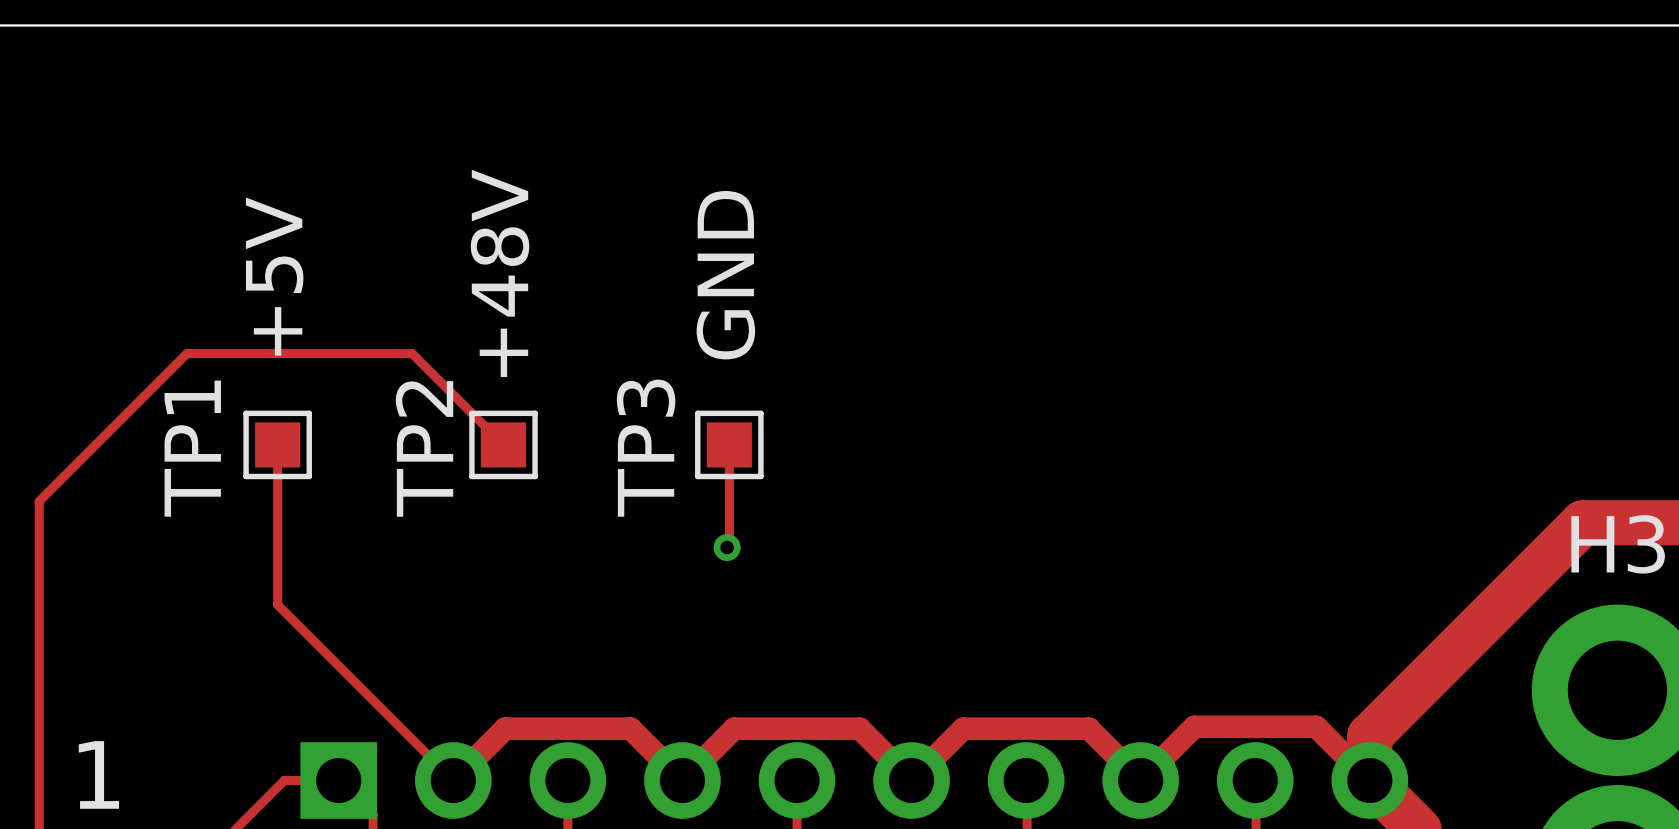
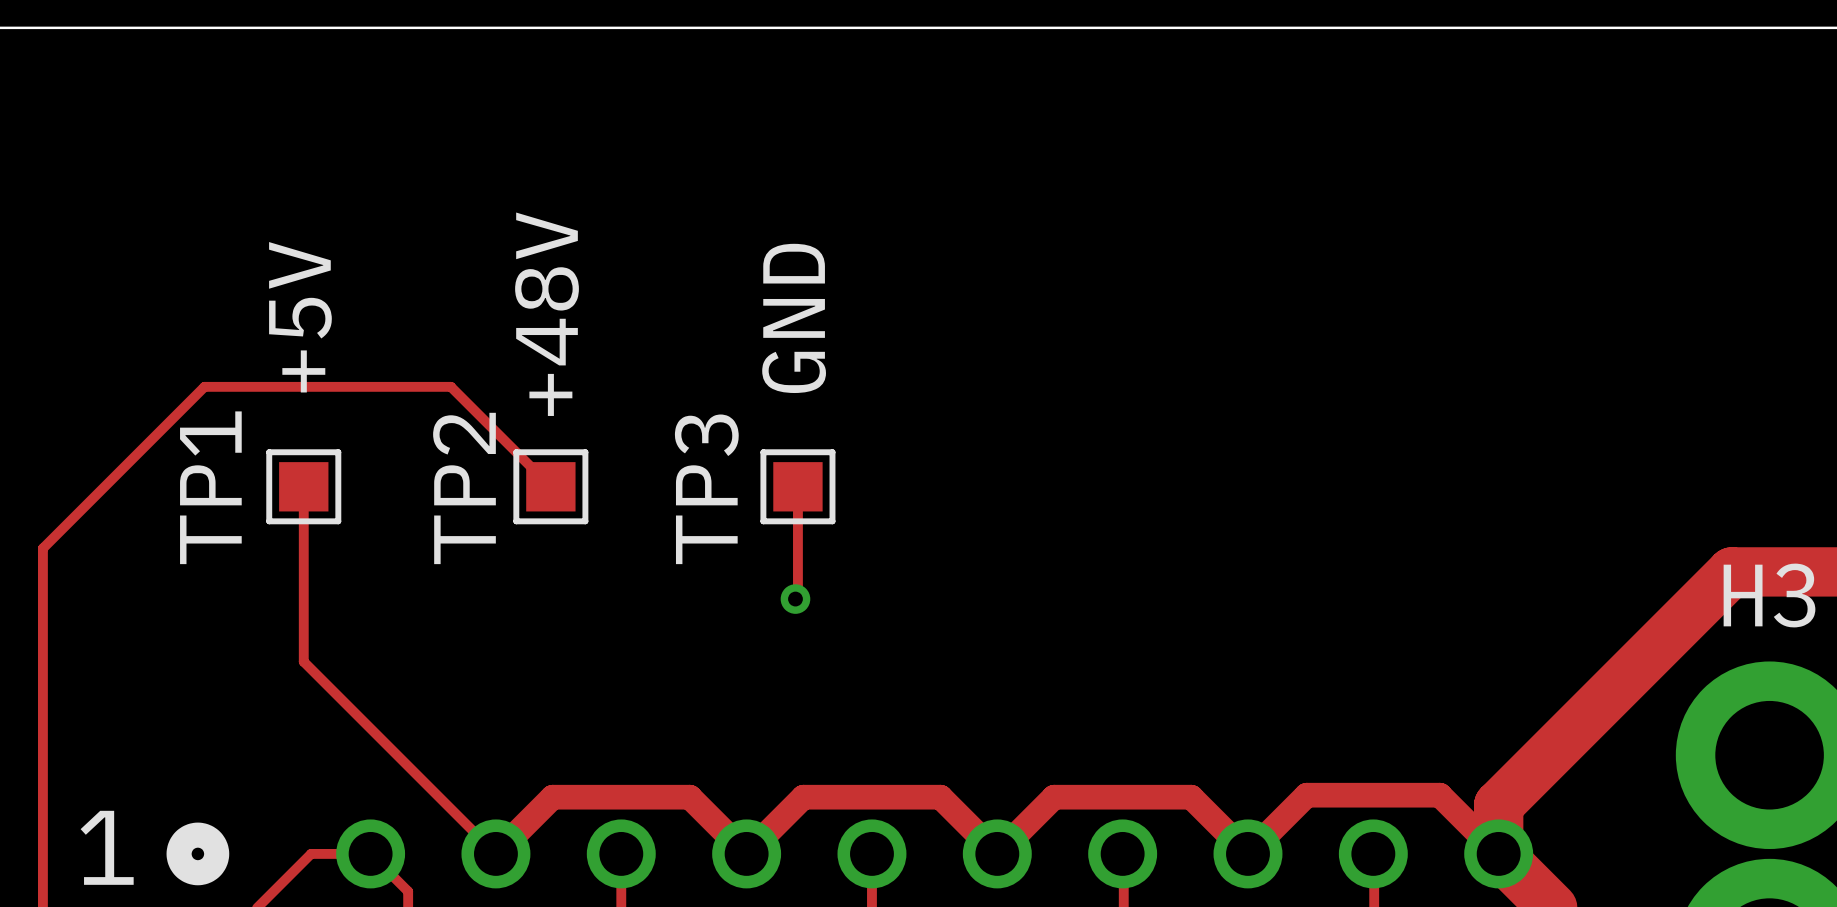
part: none -> (849, 853)
part: (854, 780) -> none

